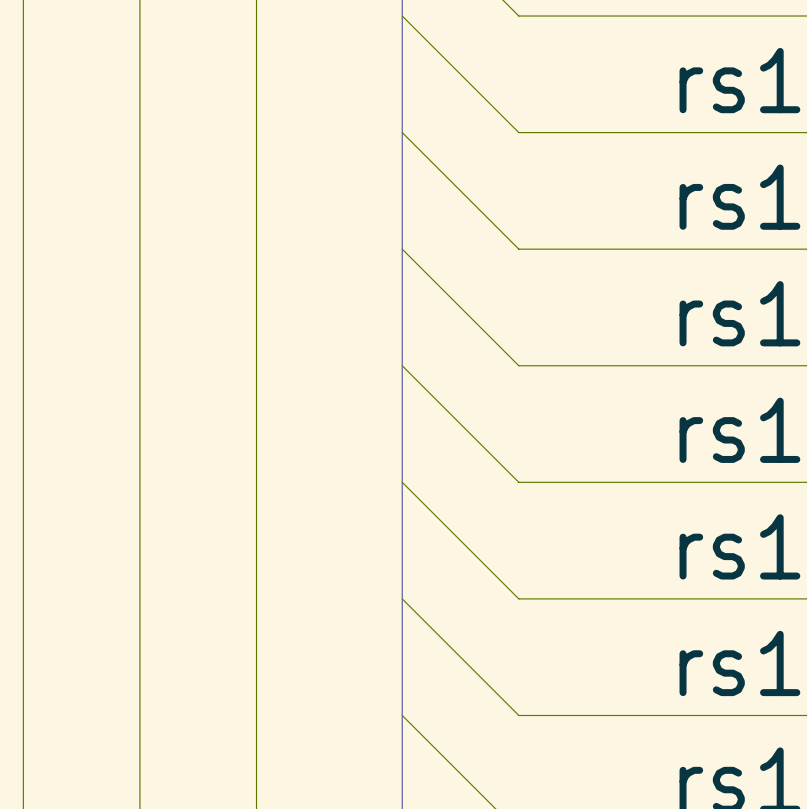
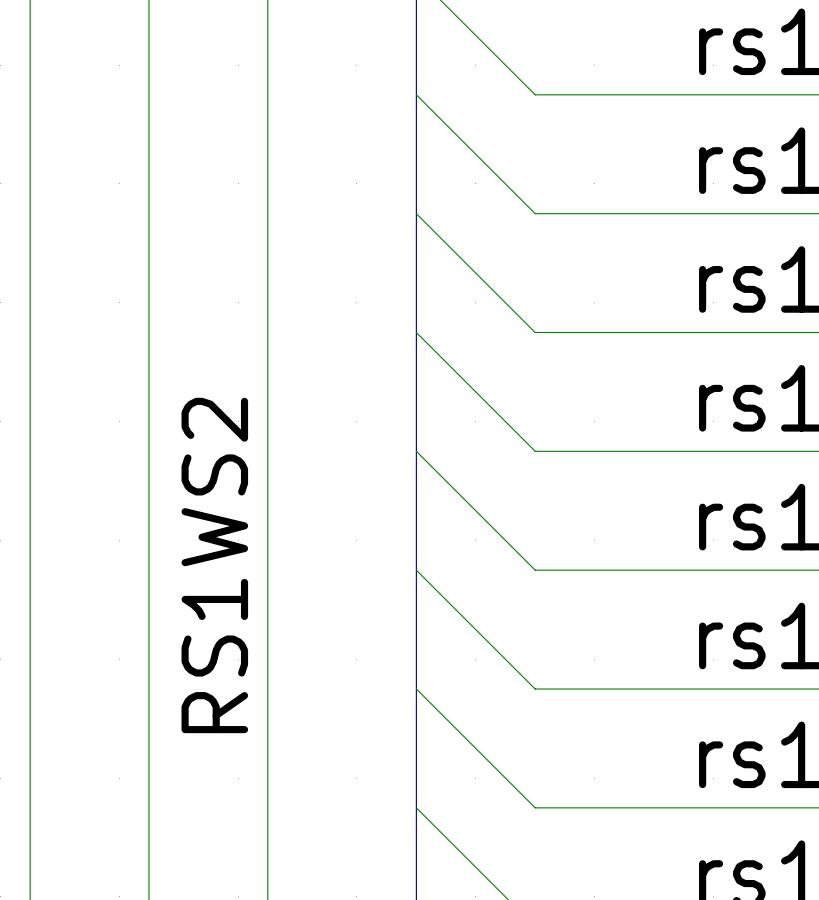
label: none -> RS1WS2 (214, 565)

